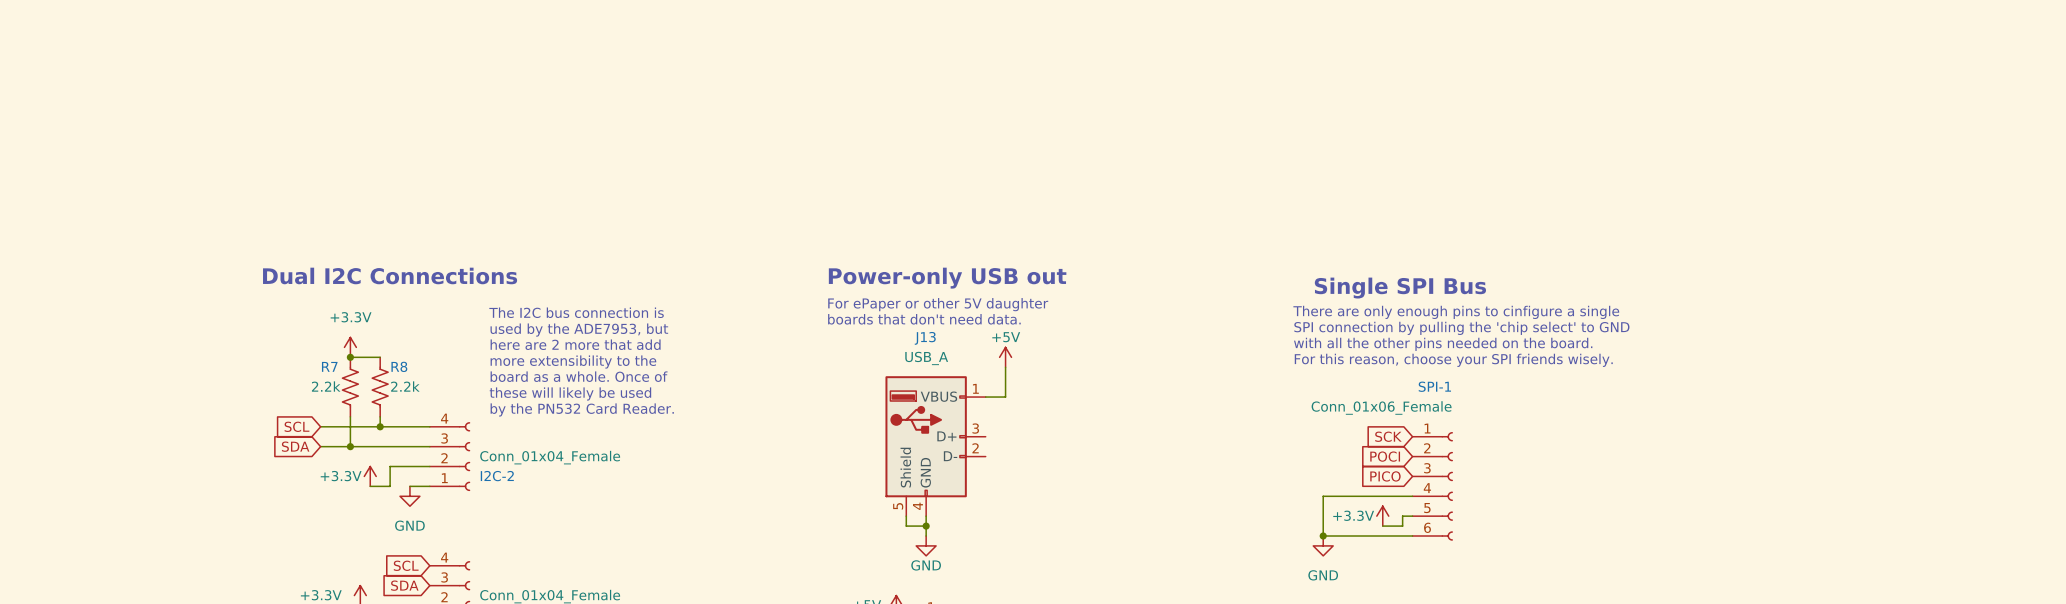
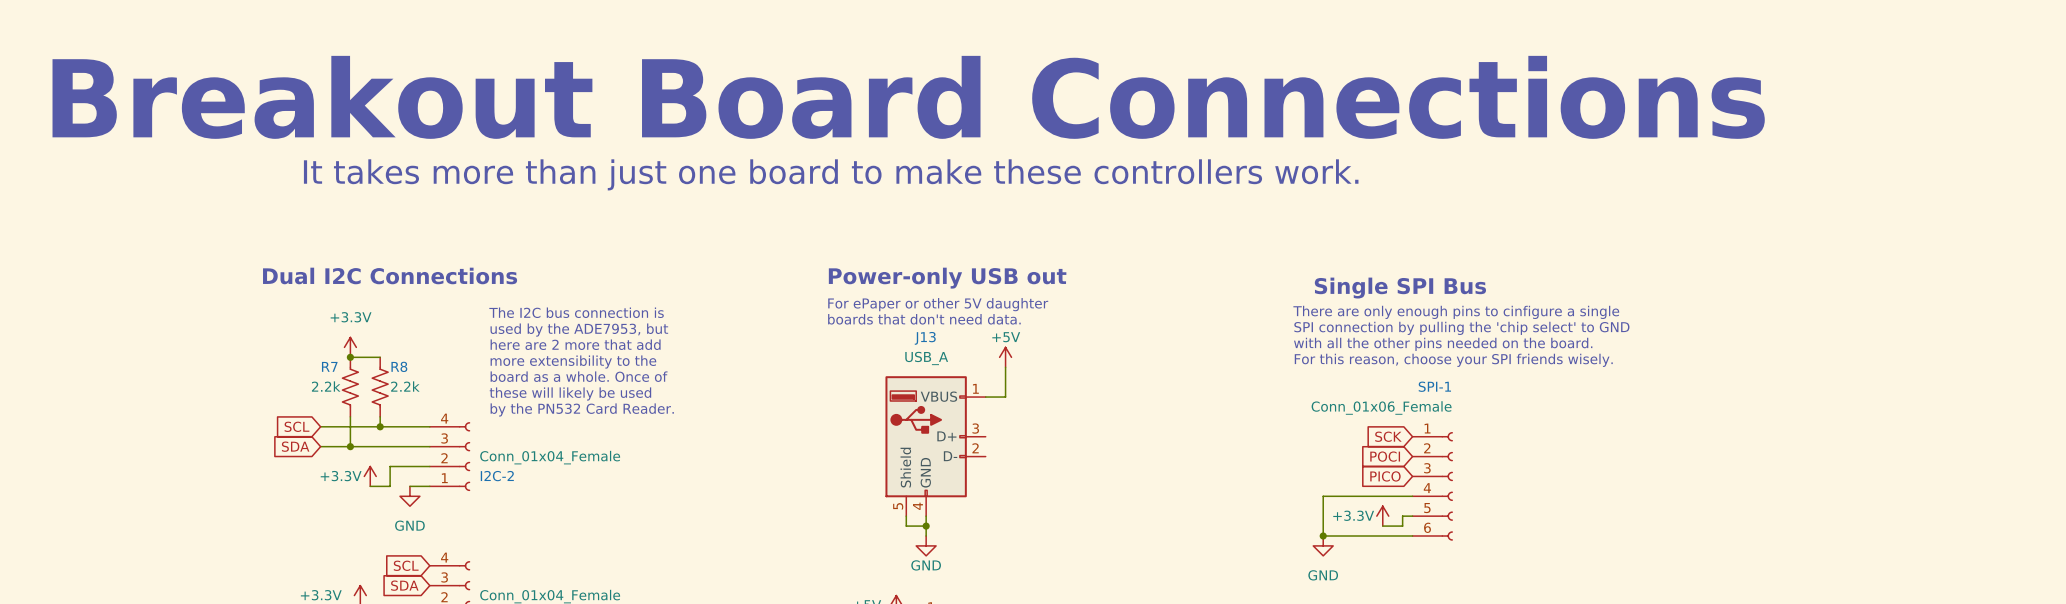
text: none -> Breakout Board Connections (908, 97)
text: none -> It takes more than just one board to make these controllers work. (831, 174)

